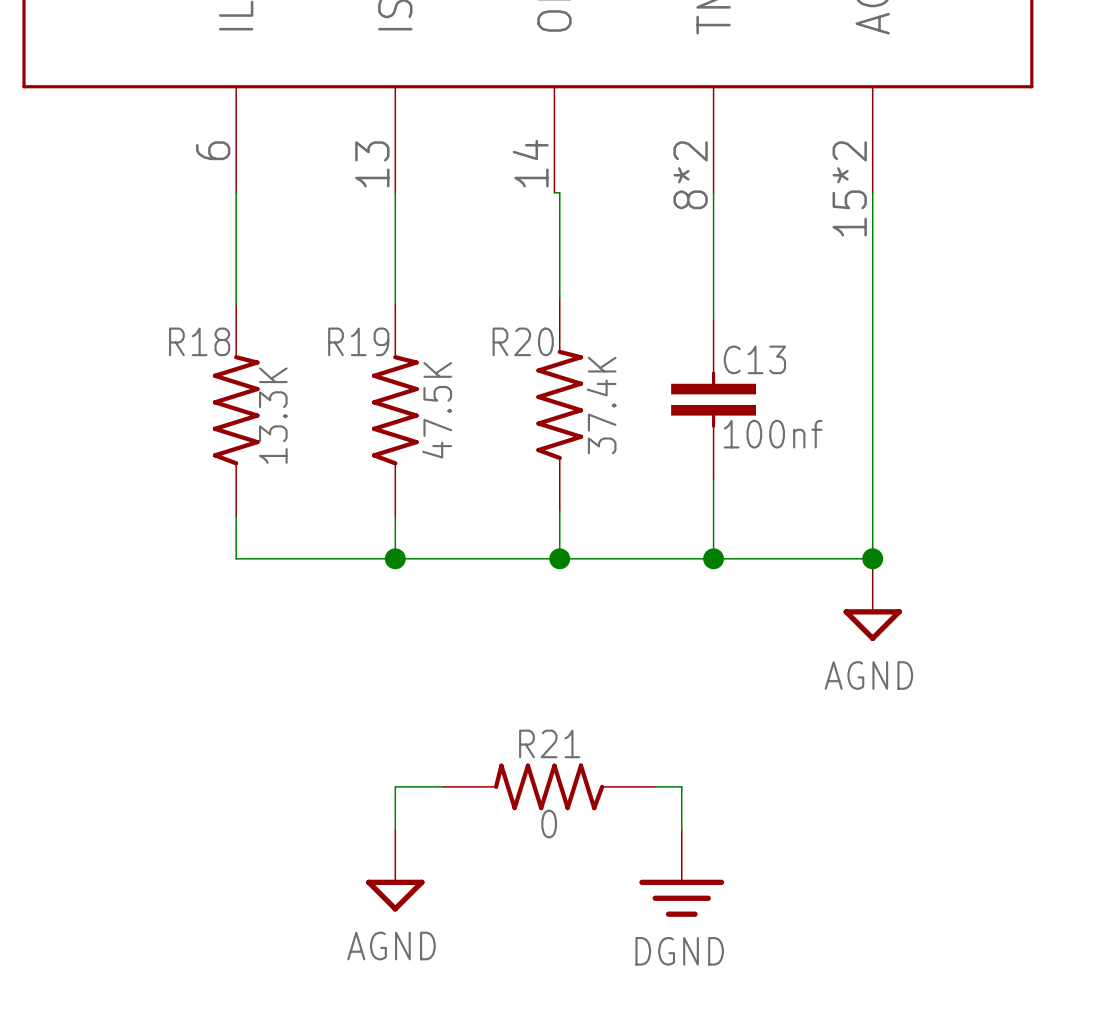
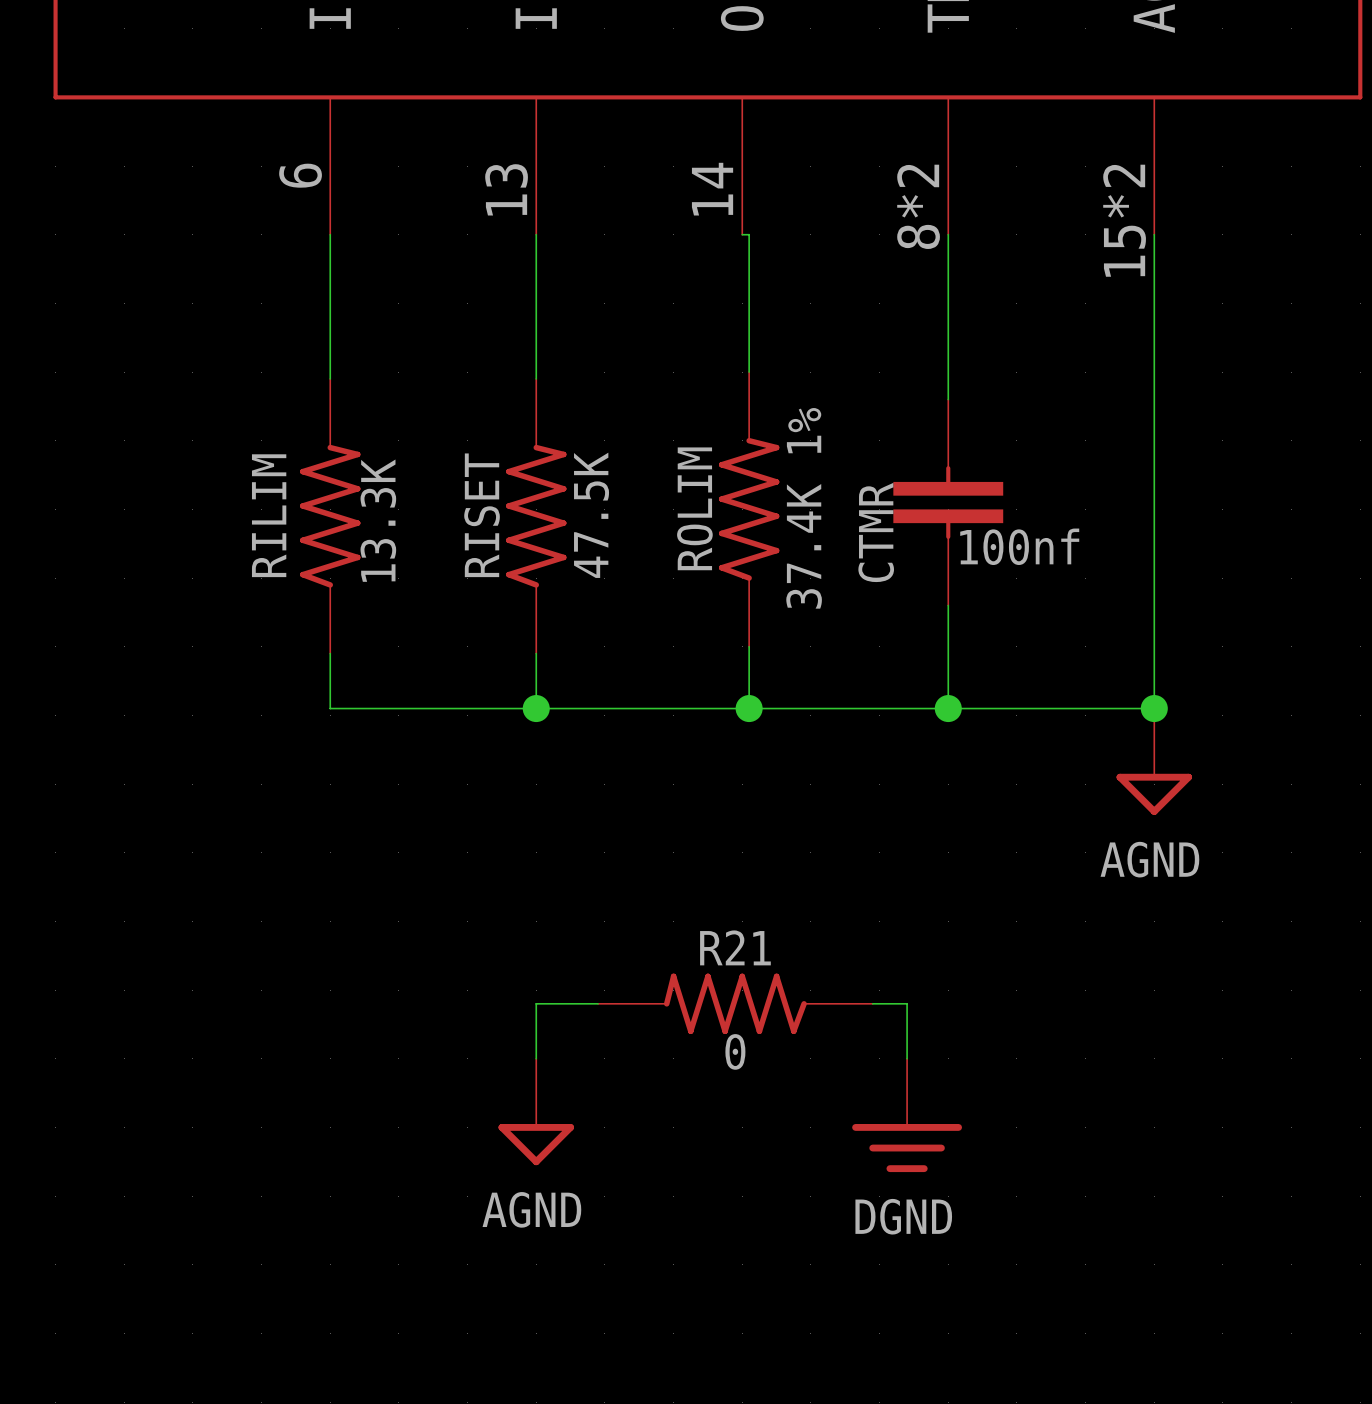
R18 name: R18 (199, 341) -> RILIM (269, 515)
R19 name: R19 (358, 341) -> RISET (482, 515)
R20 name: R20 (523, 341) -> ROLIM (694, 508)
C13 name: C13 (754, 359) -> CTMR (876, 532)
R20 value: 37.4K (601, 405) -> 37.4K 1% (804, 508)

